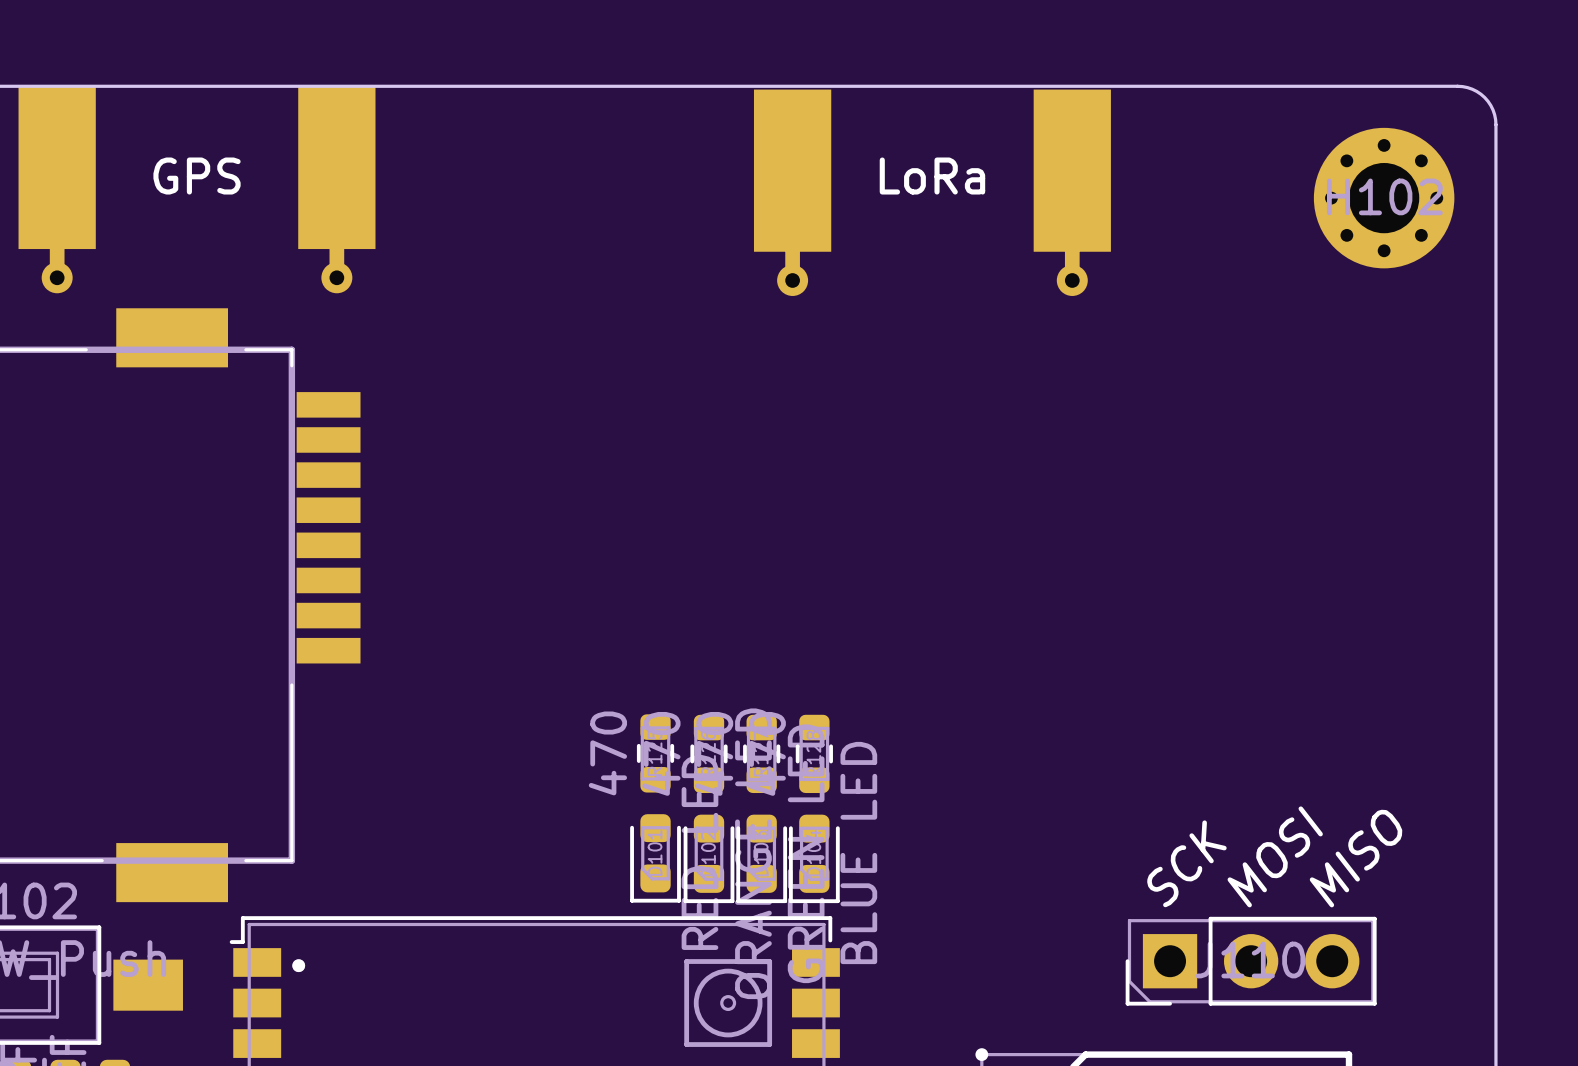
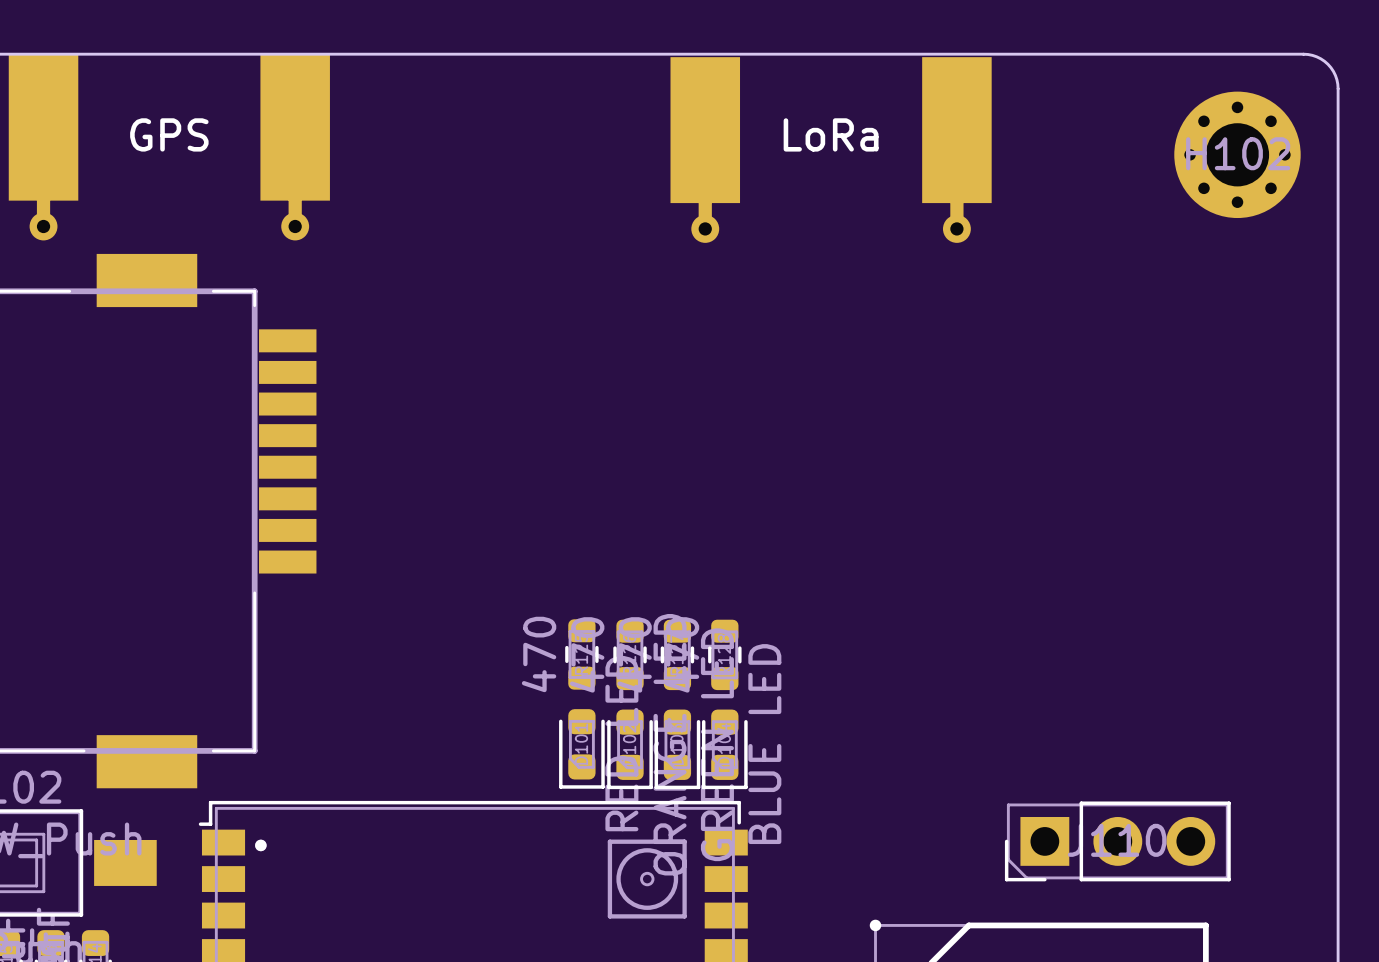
text: MOSI (1275, 856) -> none
text: MISO (1356, 858) -> none
text: SCK (1186, 863) -> none

